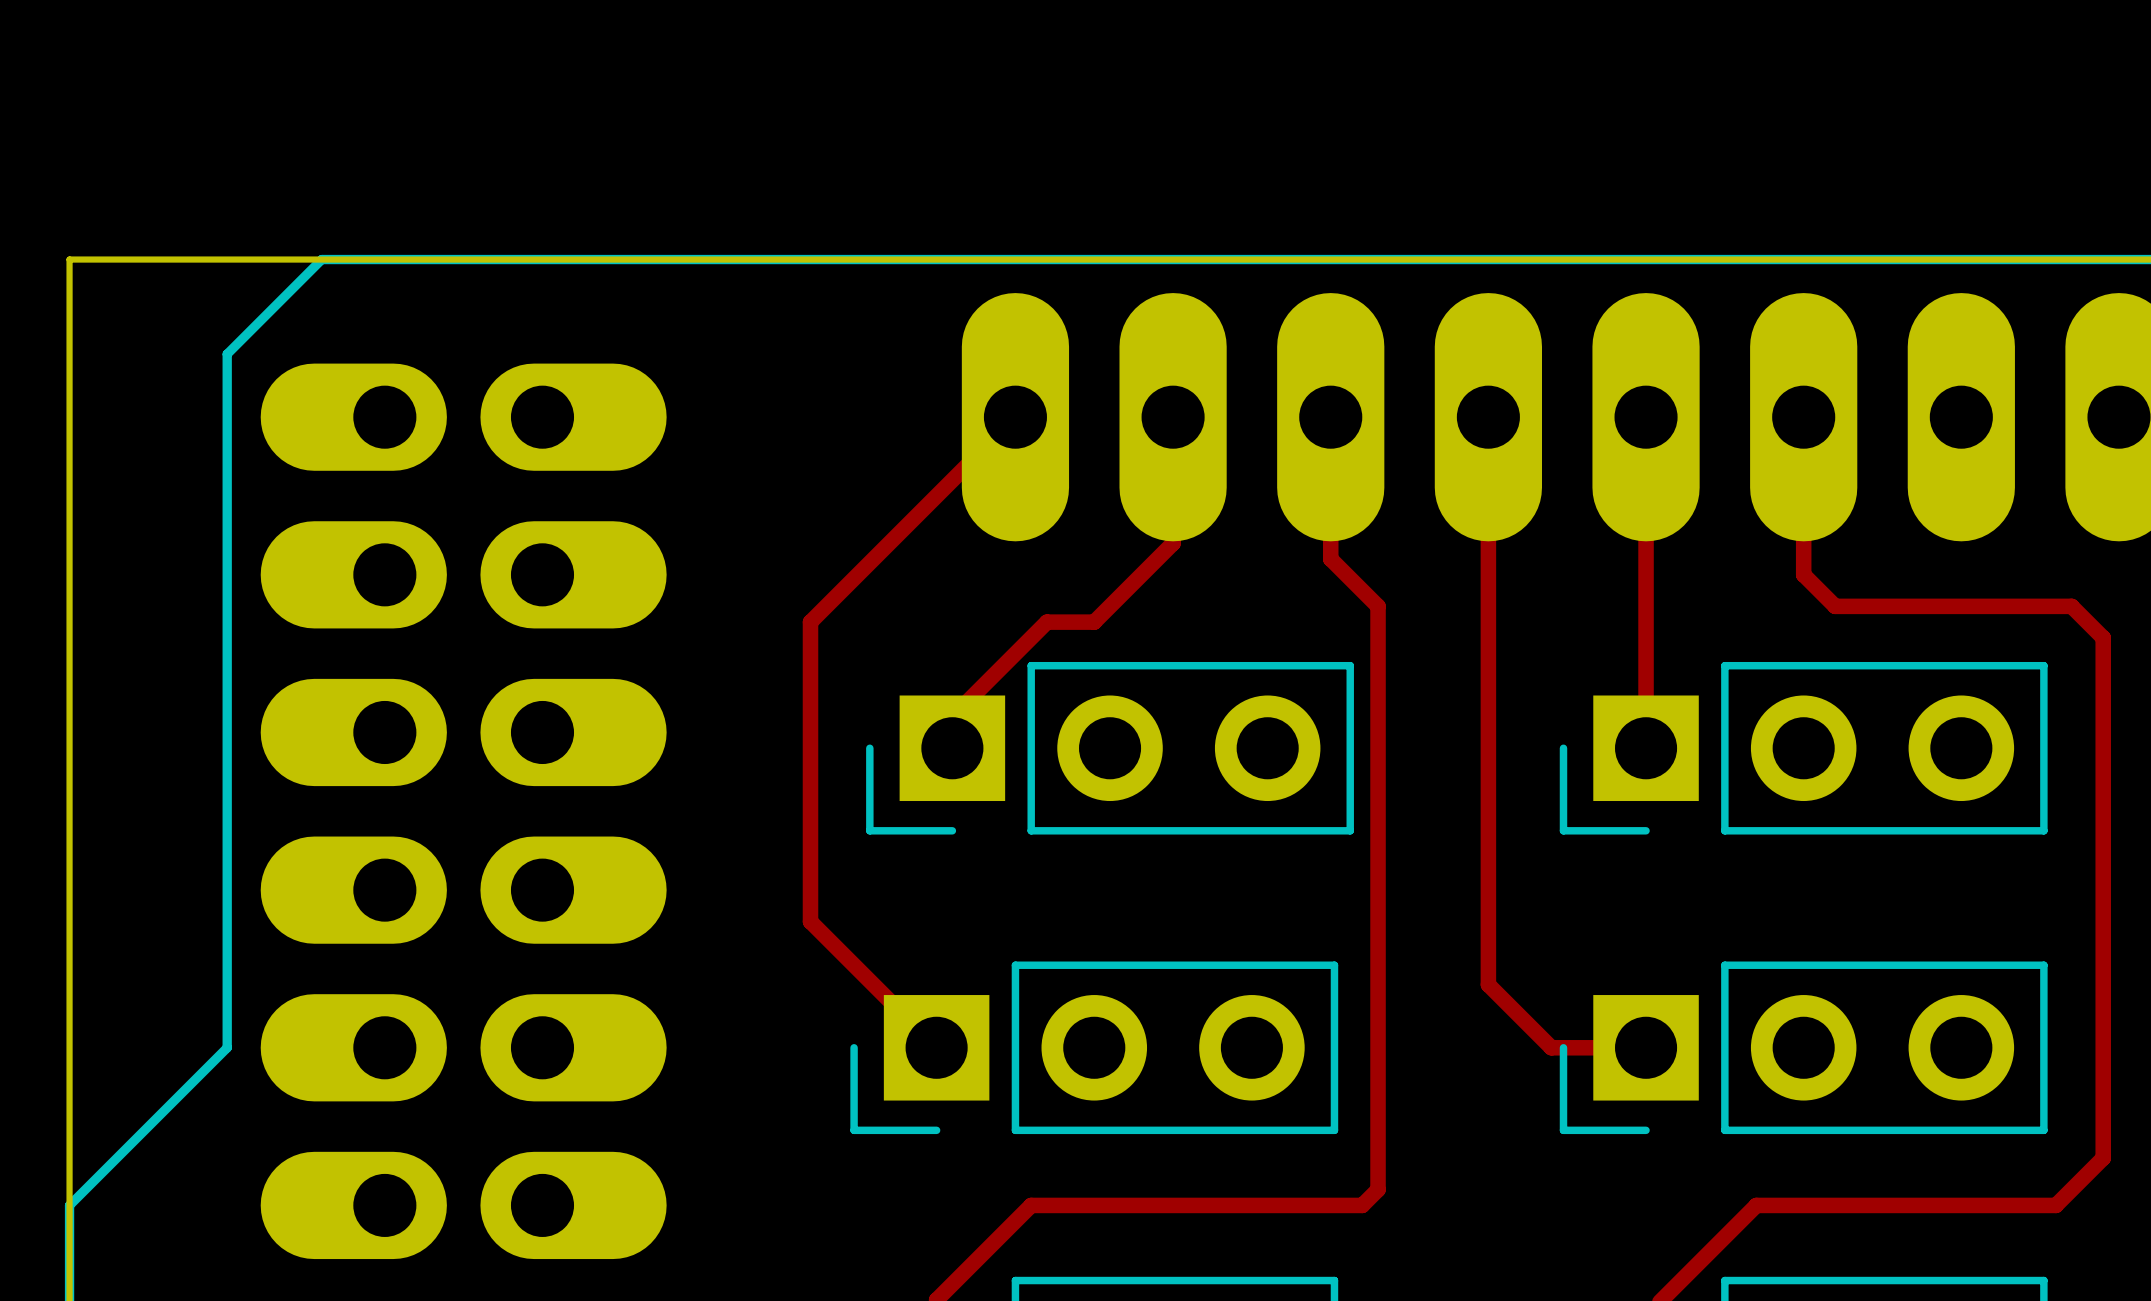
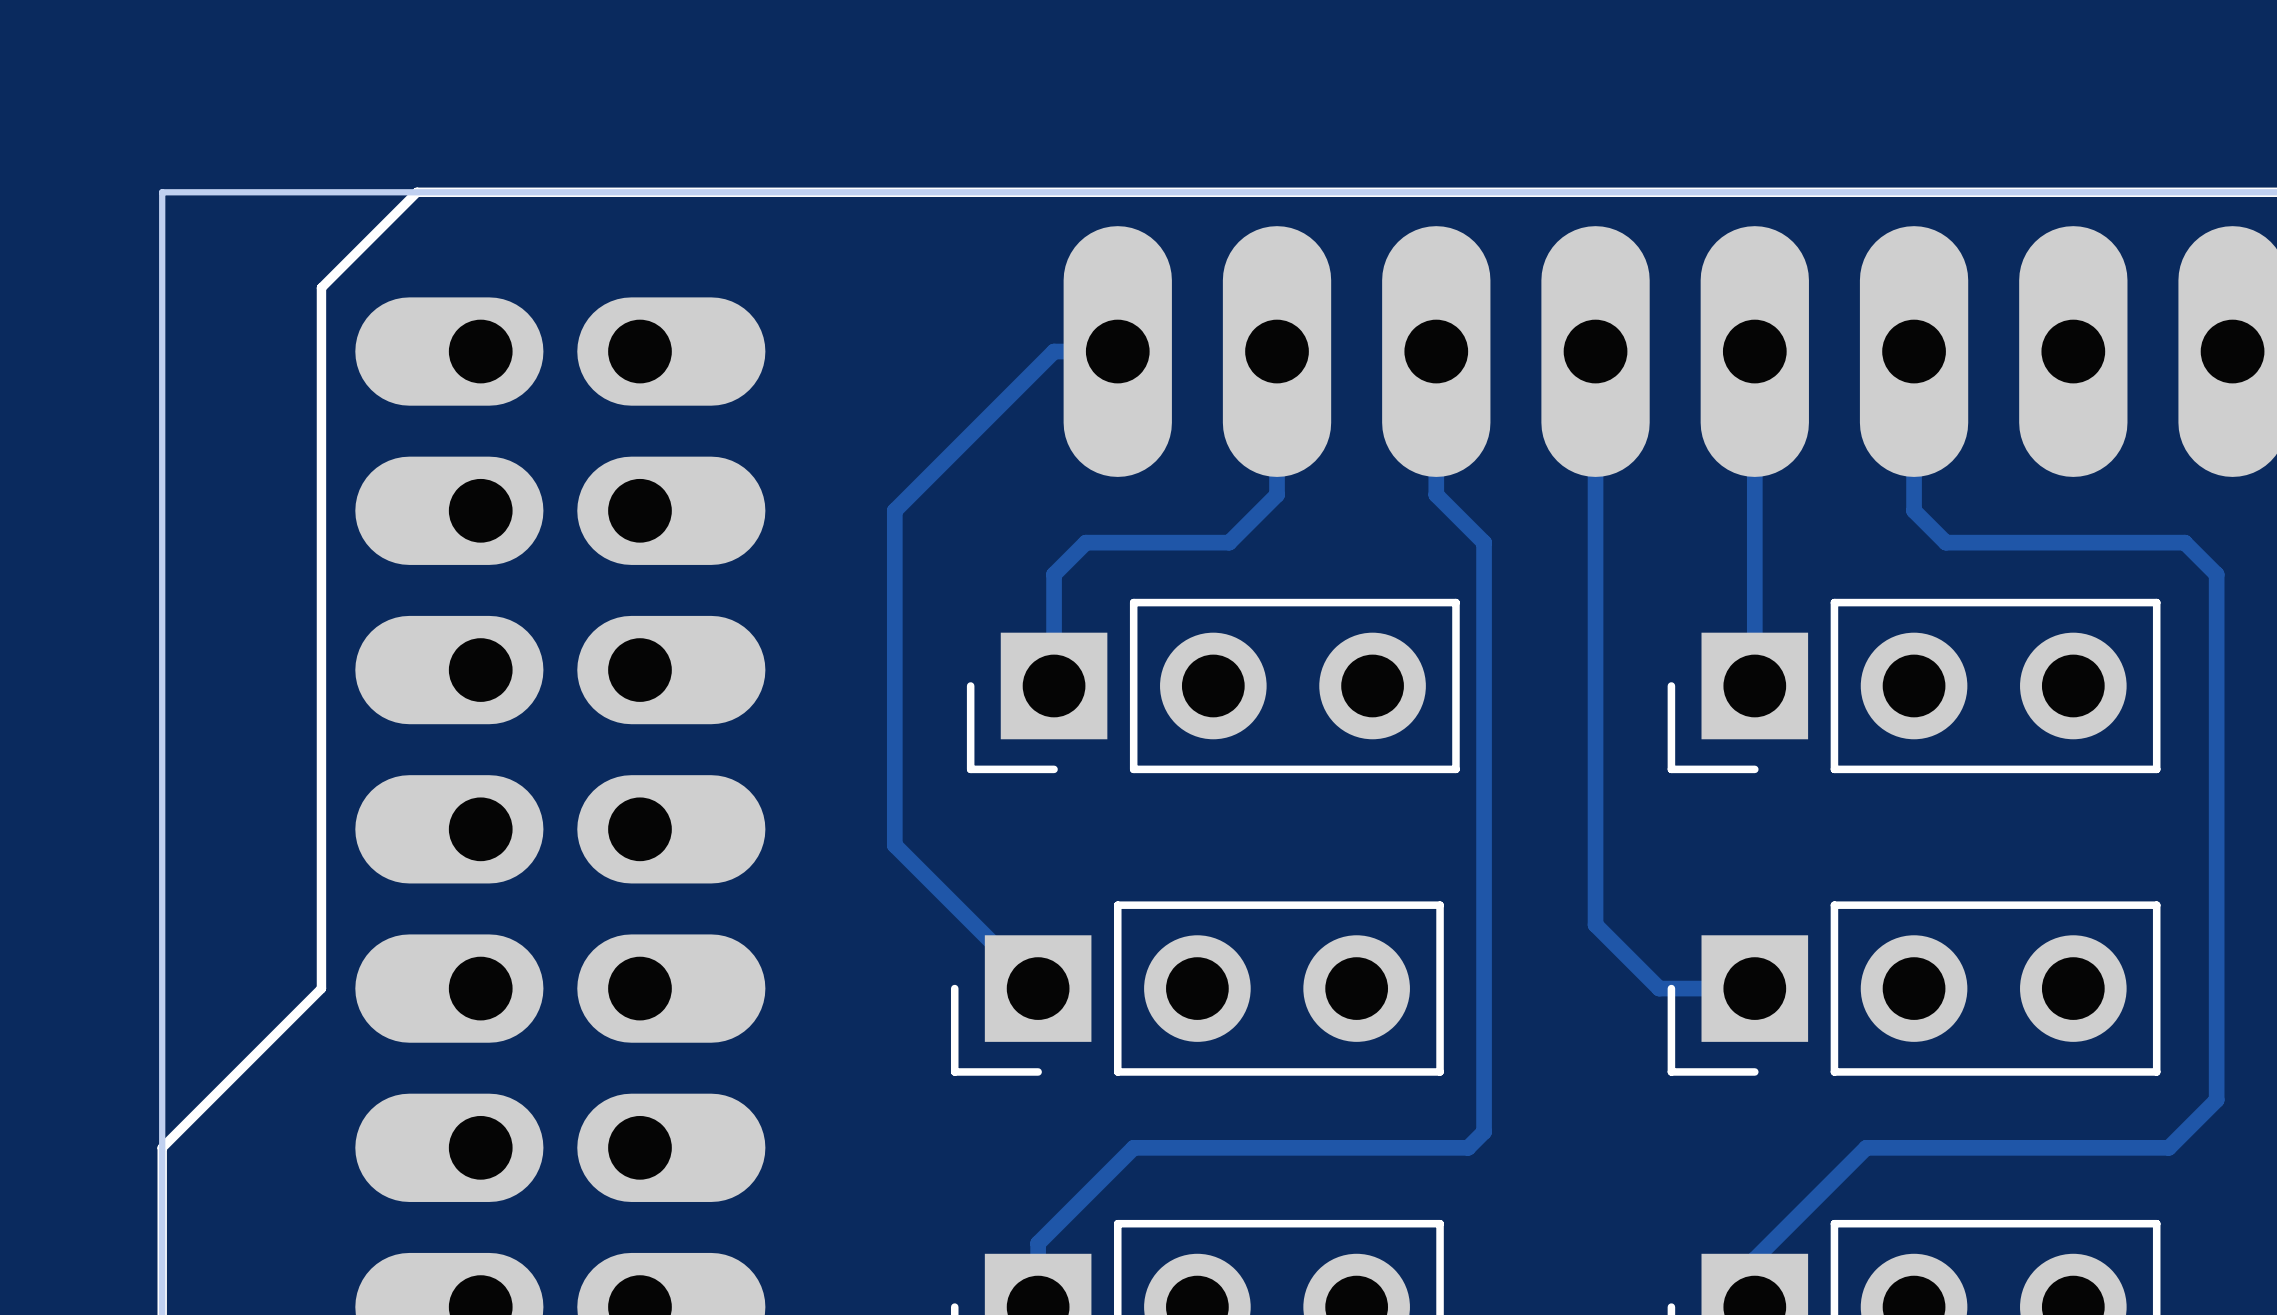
track: (1015, 417) (810, 622) (810, 921) -> (1117, 351) (1054, 351) (894, 510) (894, 845) (910, 861)
track: (1173, 543) (1094, 622) (1046, 622) (952, 716) -> (1277, 478) (1277, 494) (1229, 542) (1085, 542) (1054, 574) (1054, 685)

